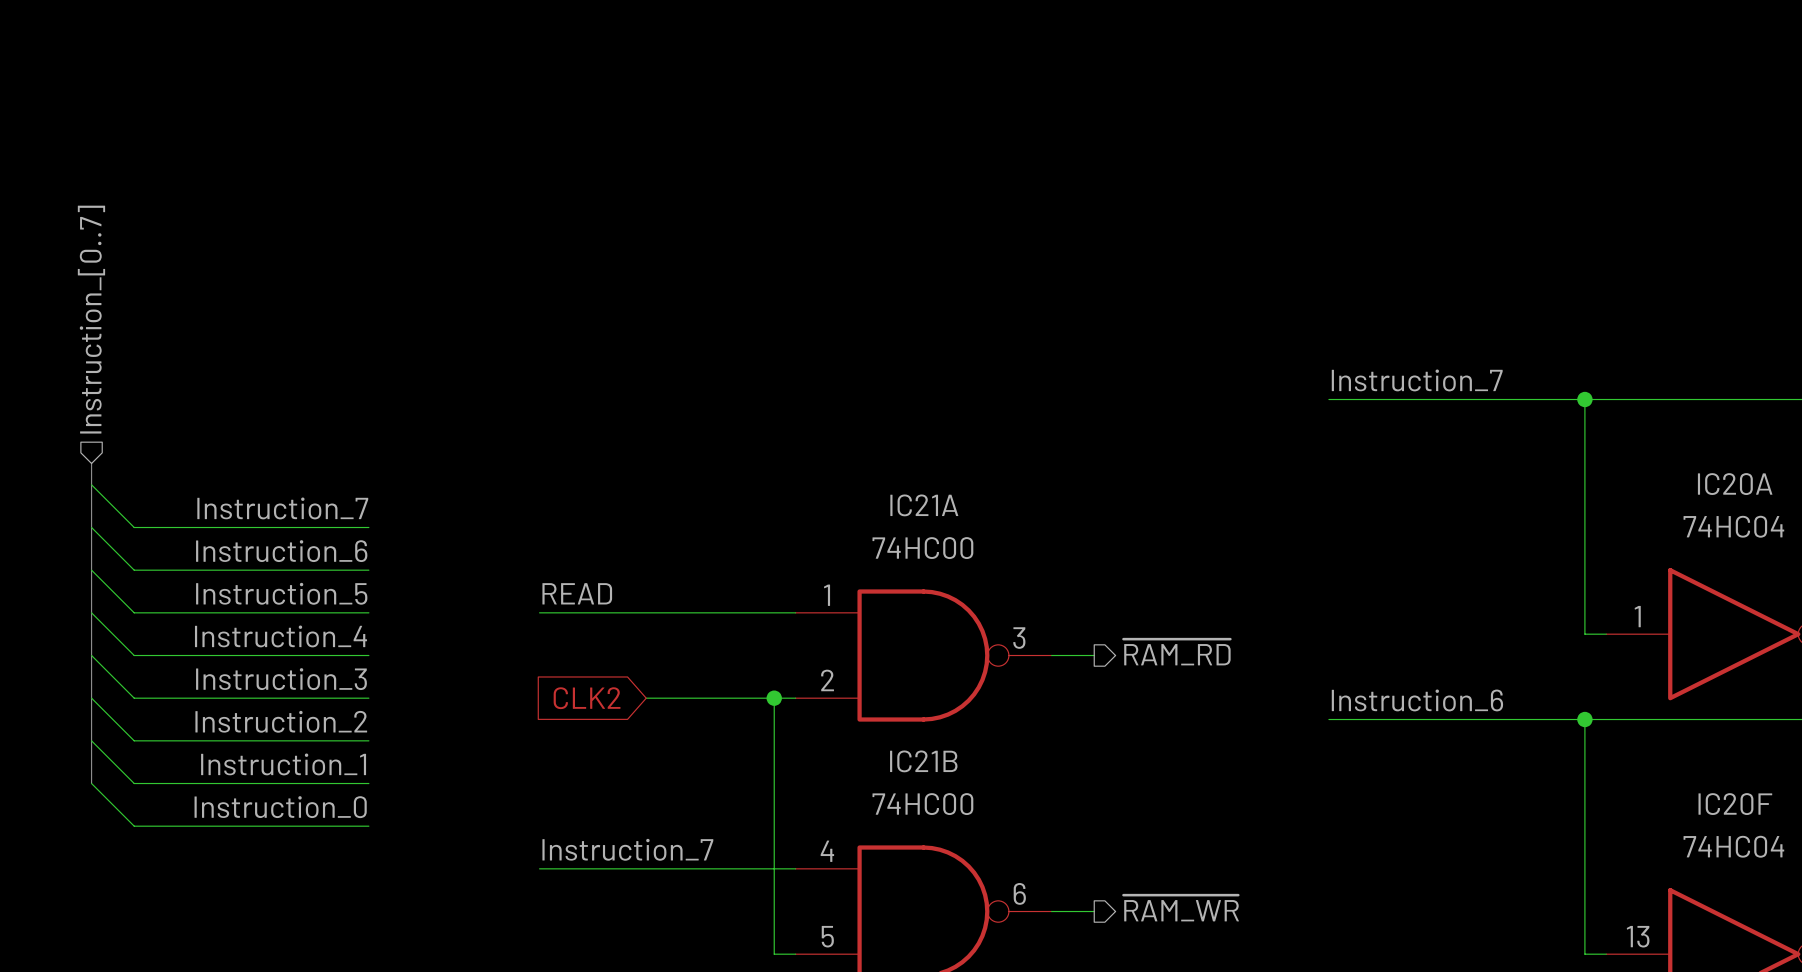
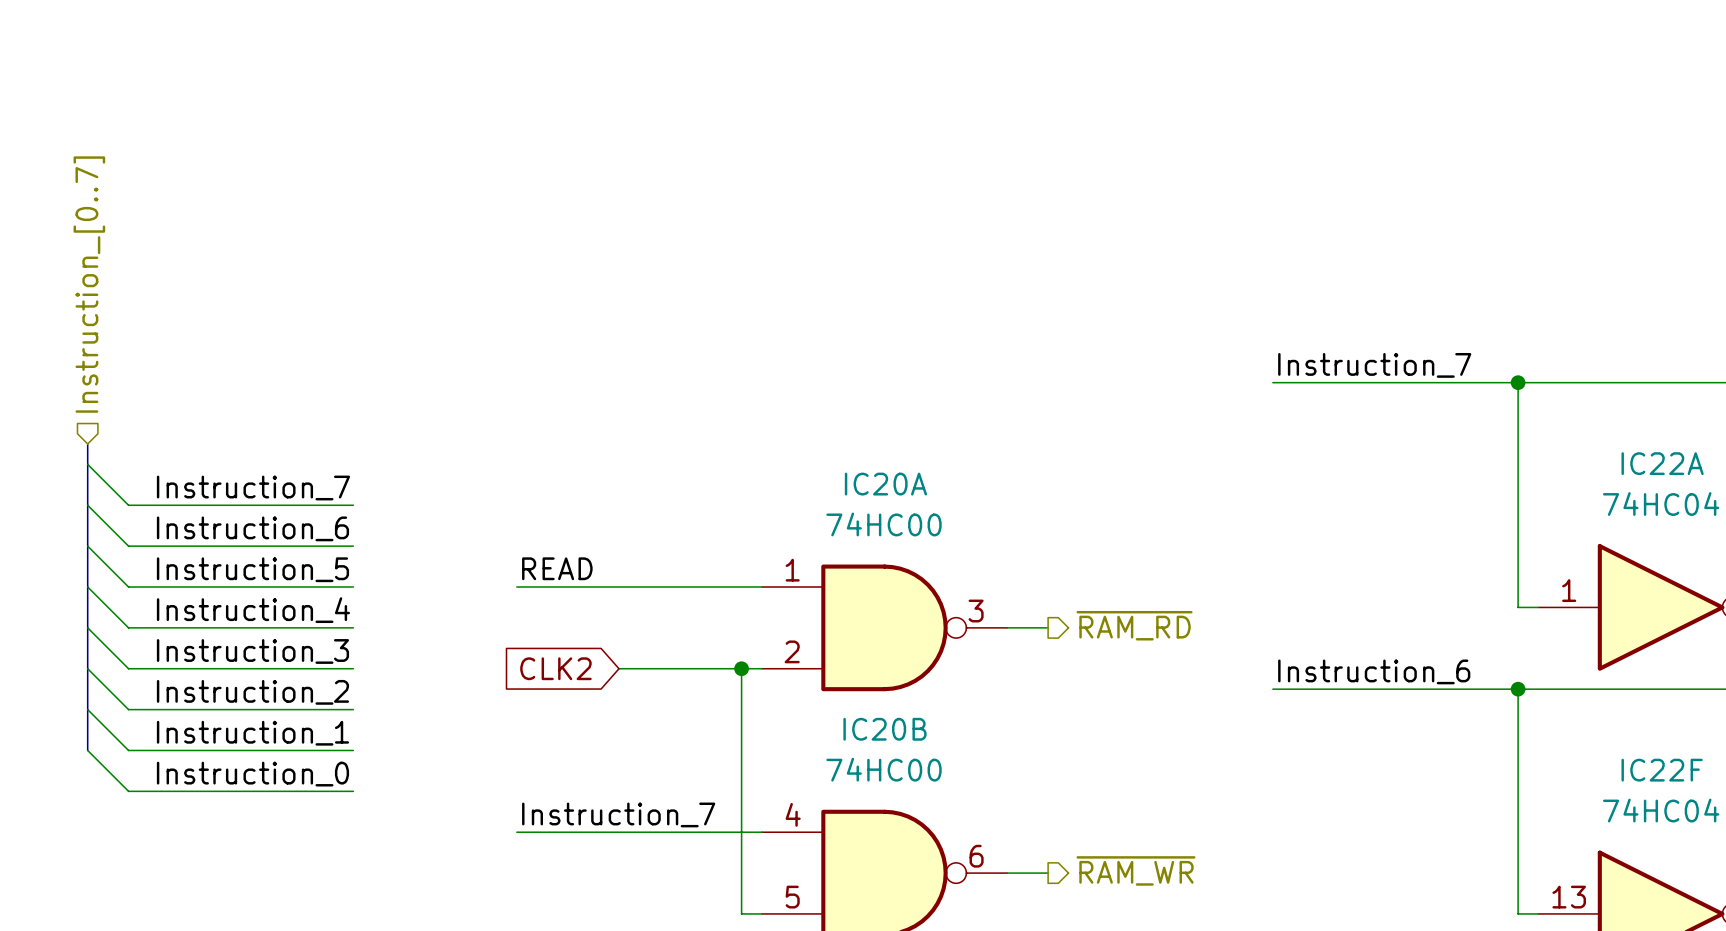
IC20A name: IC20A (1735, 484) -> IC22A (1662, 463)
IC21A name: IC21A (924, 505) -> IC20A (885, 484)
IC21B name: IC21B (923, 761) -> IC20B (884, 729)
IC20F name: IC20F (1735, 804) -> IC22F (1662, 770)

